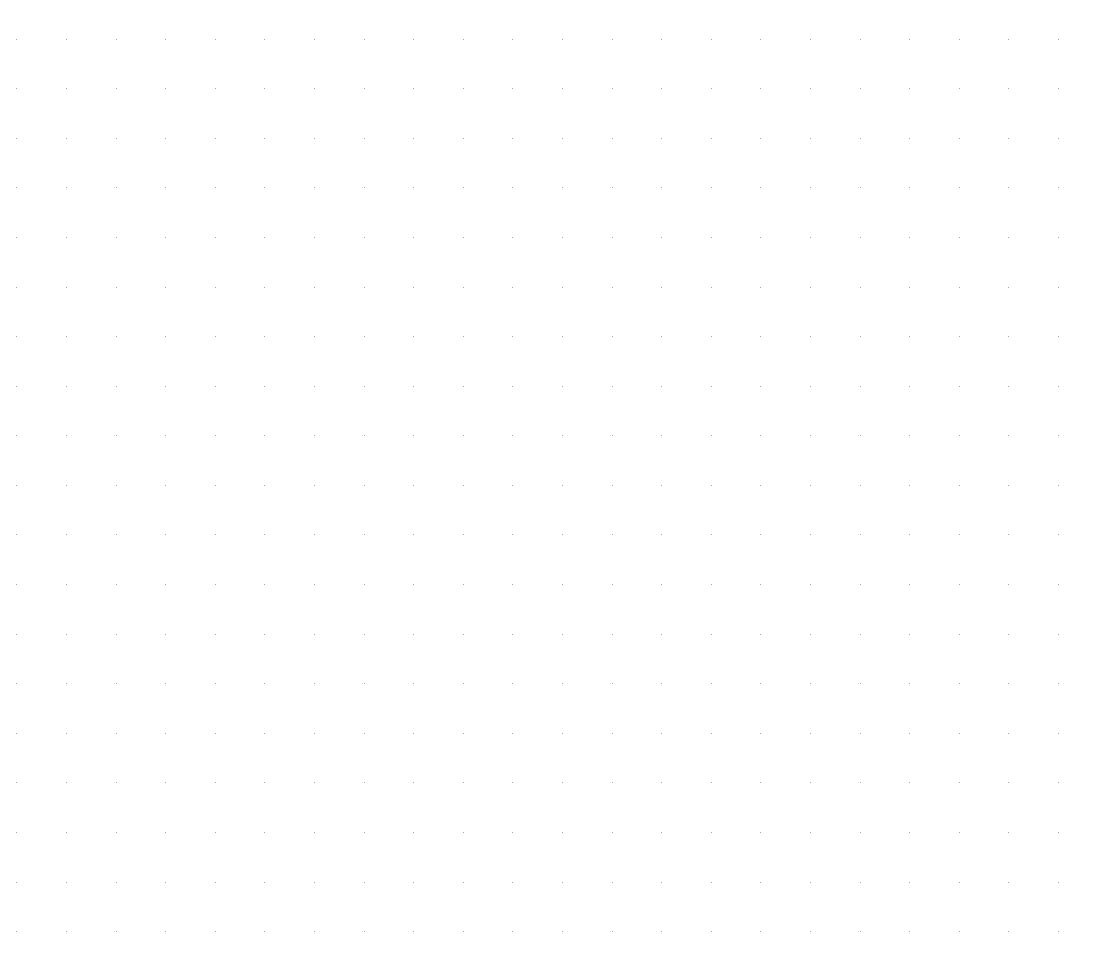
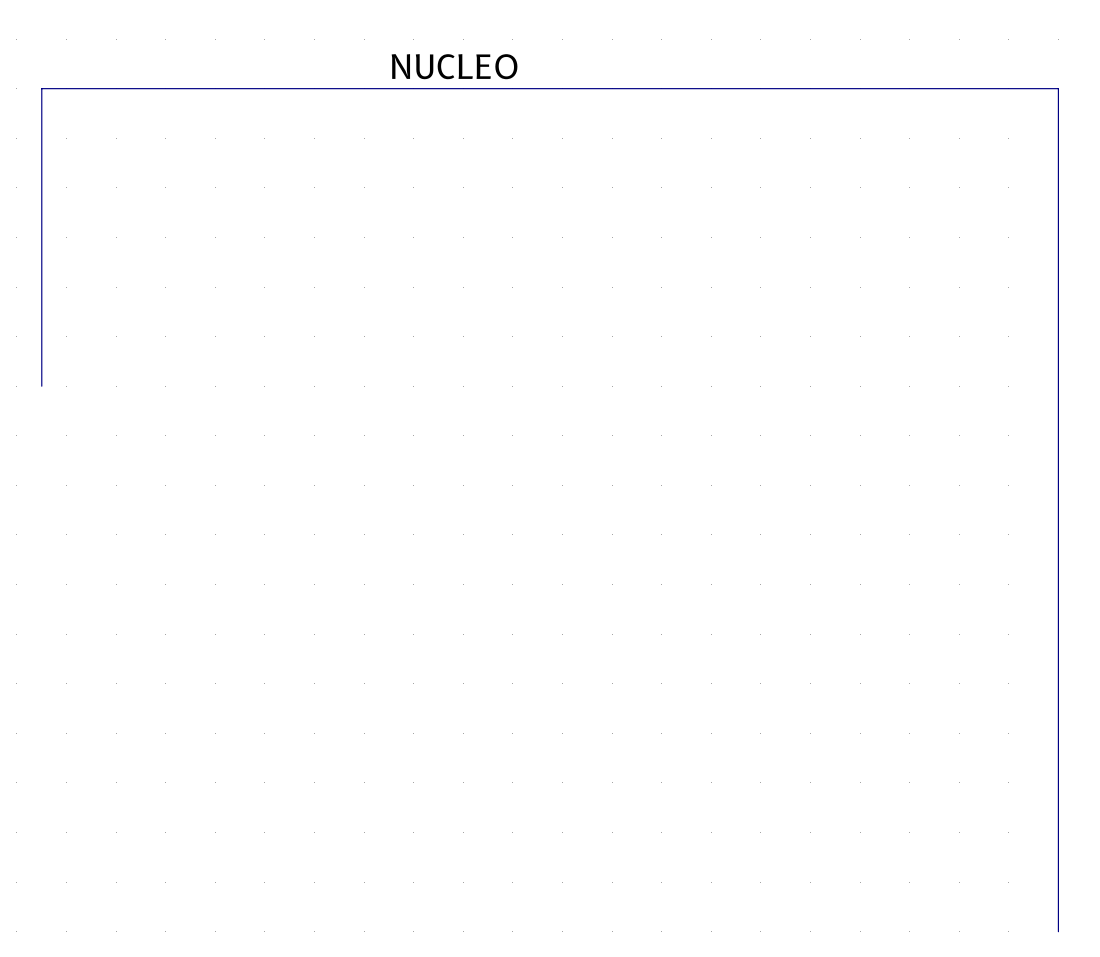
label: none -> NUCLEO (454, 66)
bus: none -> (41, 386) (41, 88) (1058, 88) (1058, 931)

